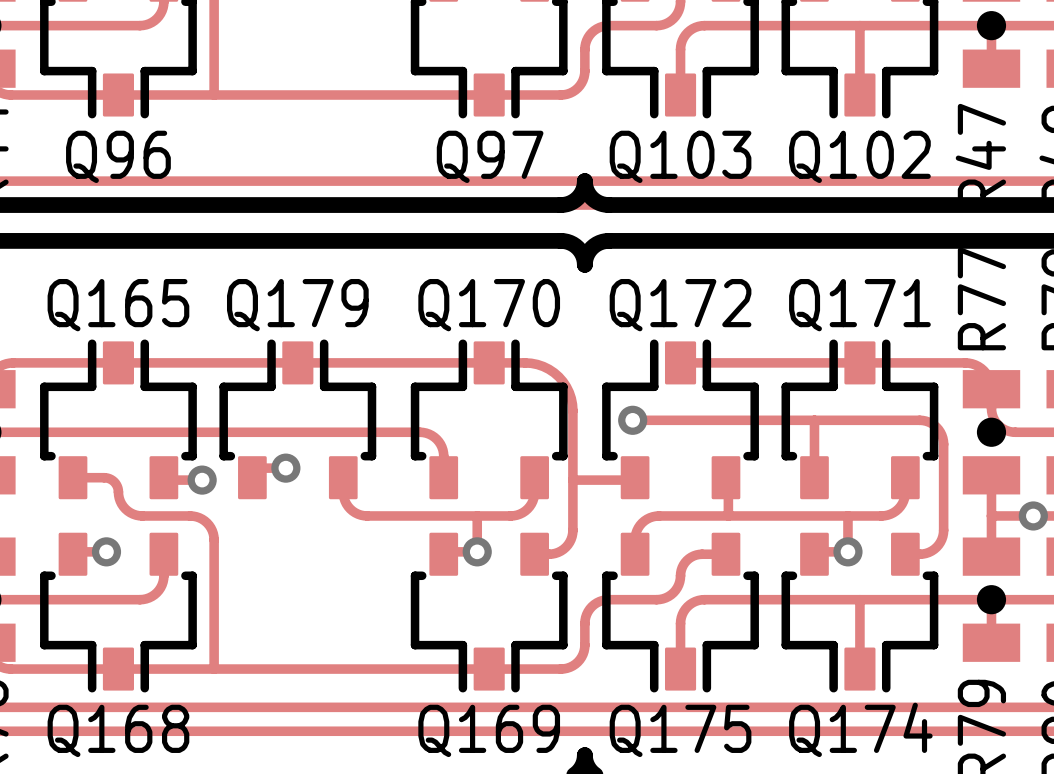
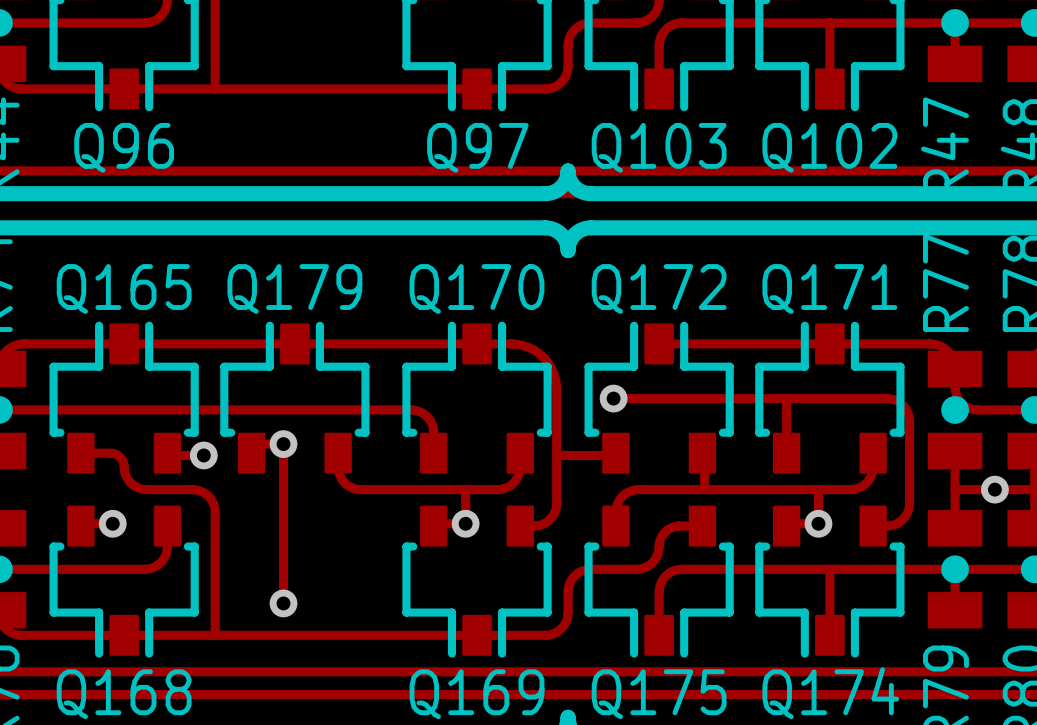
track: none -> (283, 444) (283, 603)
via: none -> (283, 603)

